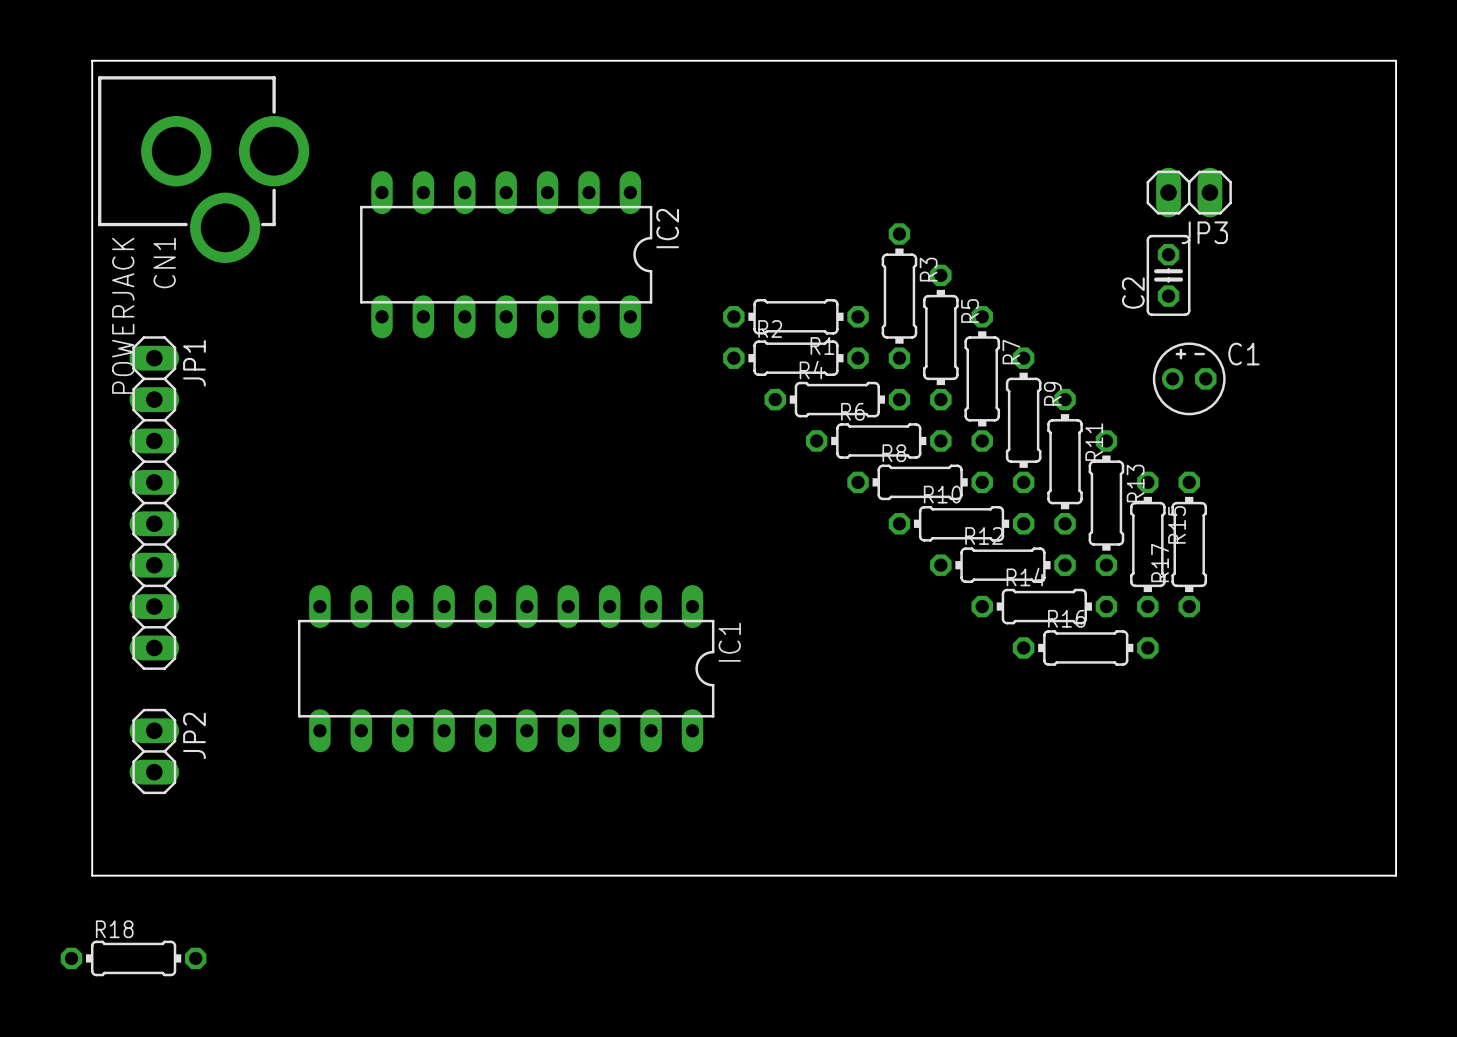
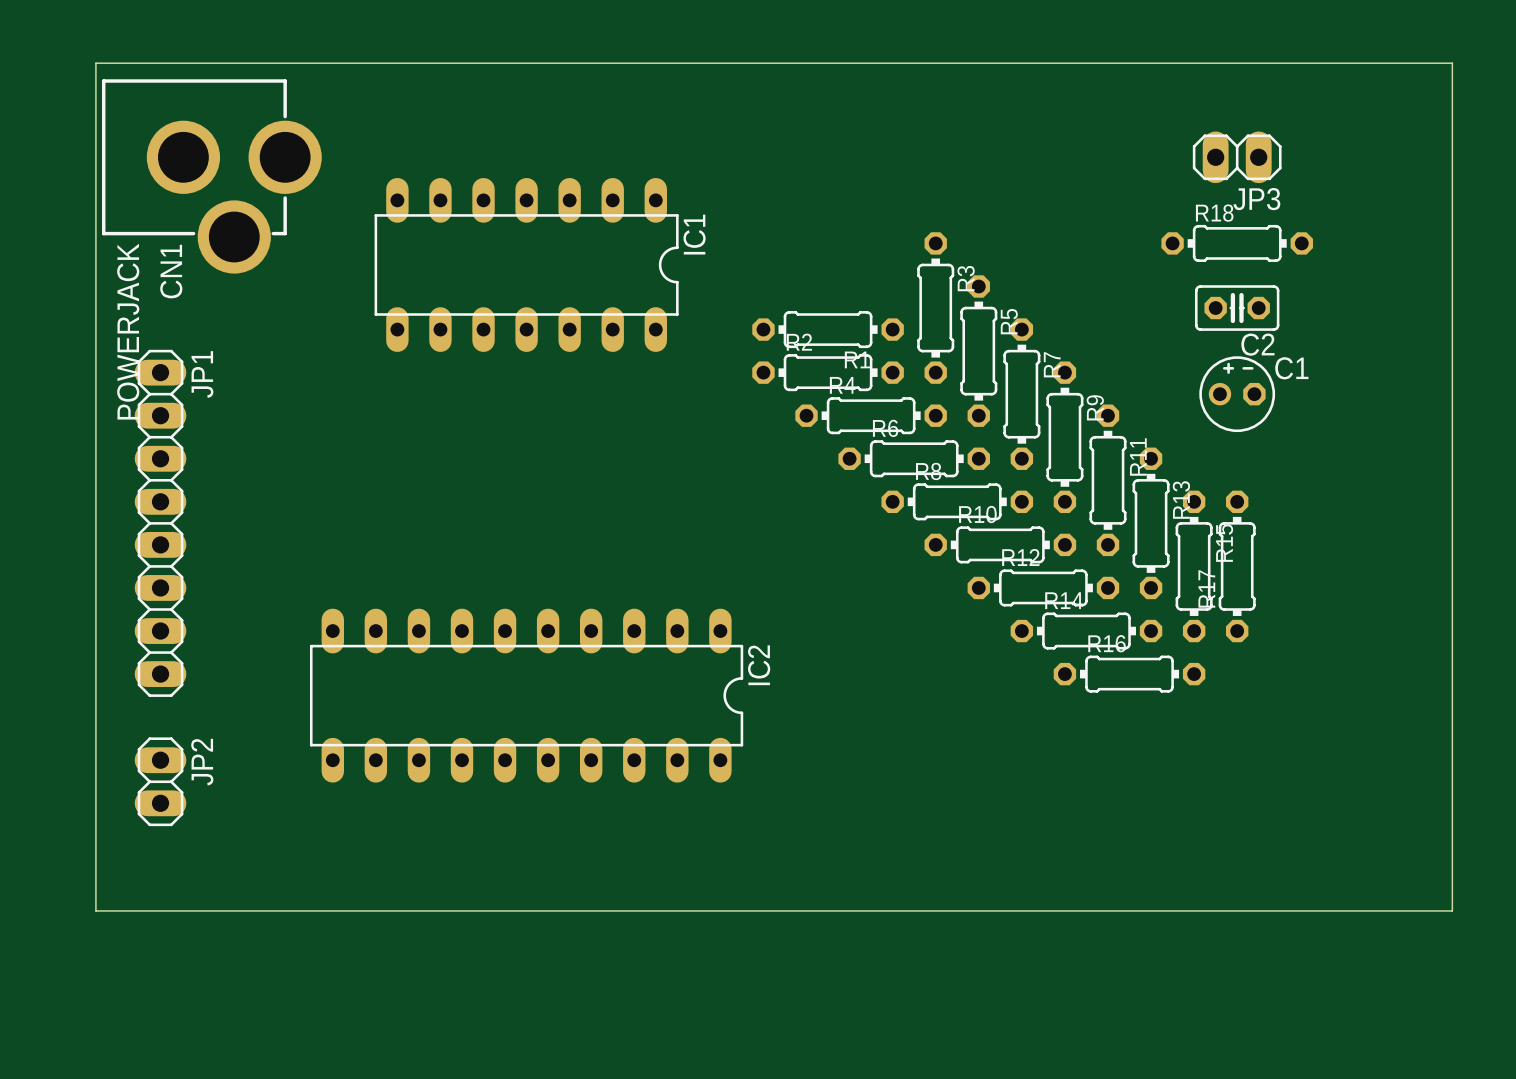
JP3 position: (1189, 192) -> (1237, 157)
IC2 name: IC2 (667, 228) -> IC1 (694, 234)
C2 rotation: 0° (1168, 275) -> 90° clockwise (1237, 308)
C2 name position: C2 (1133, 293) -> C2 (1257, 344)
IC1 name: IC1 (729, 642) -> IC2 (759, 665)
R18 position: (133, 958) -> (1237, 243)

